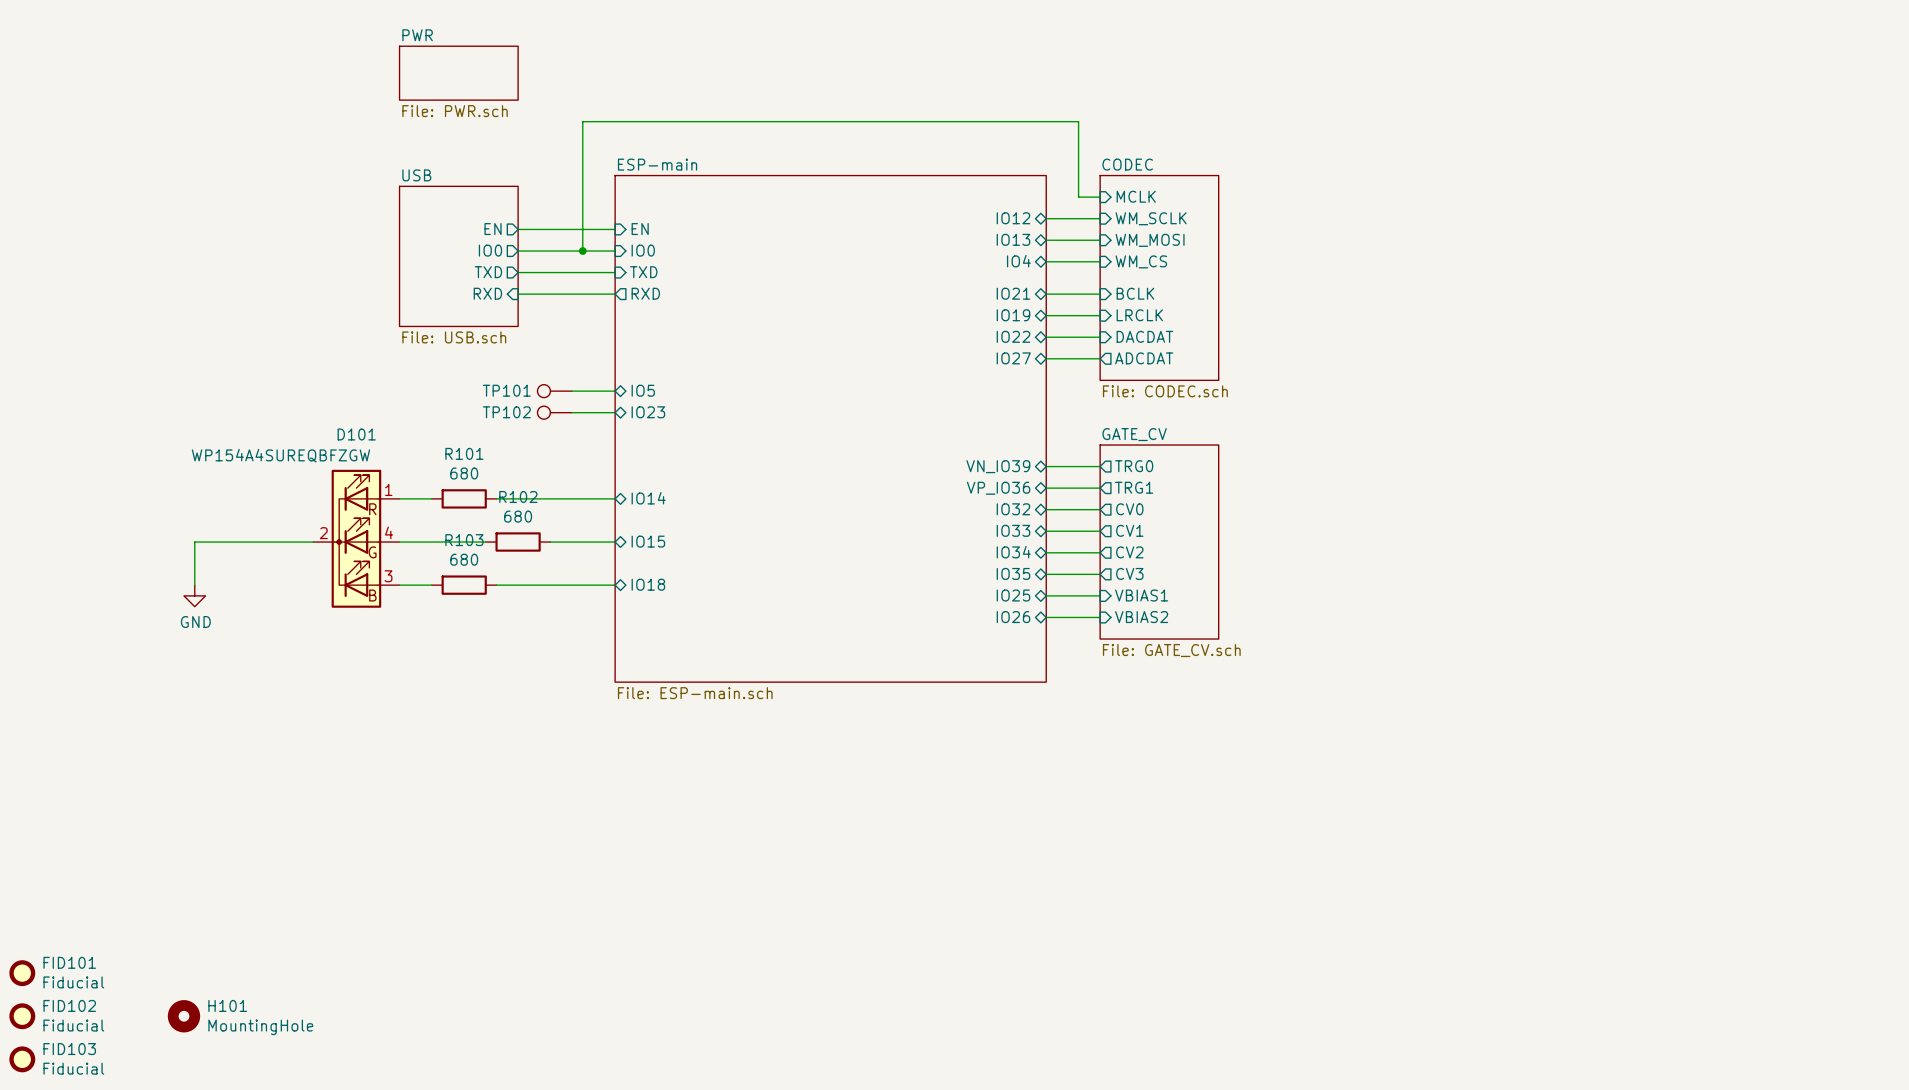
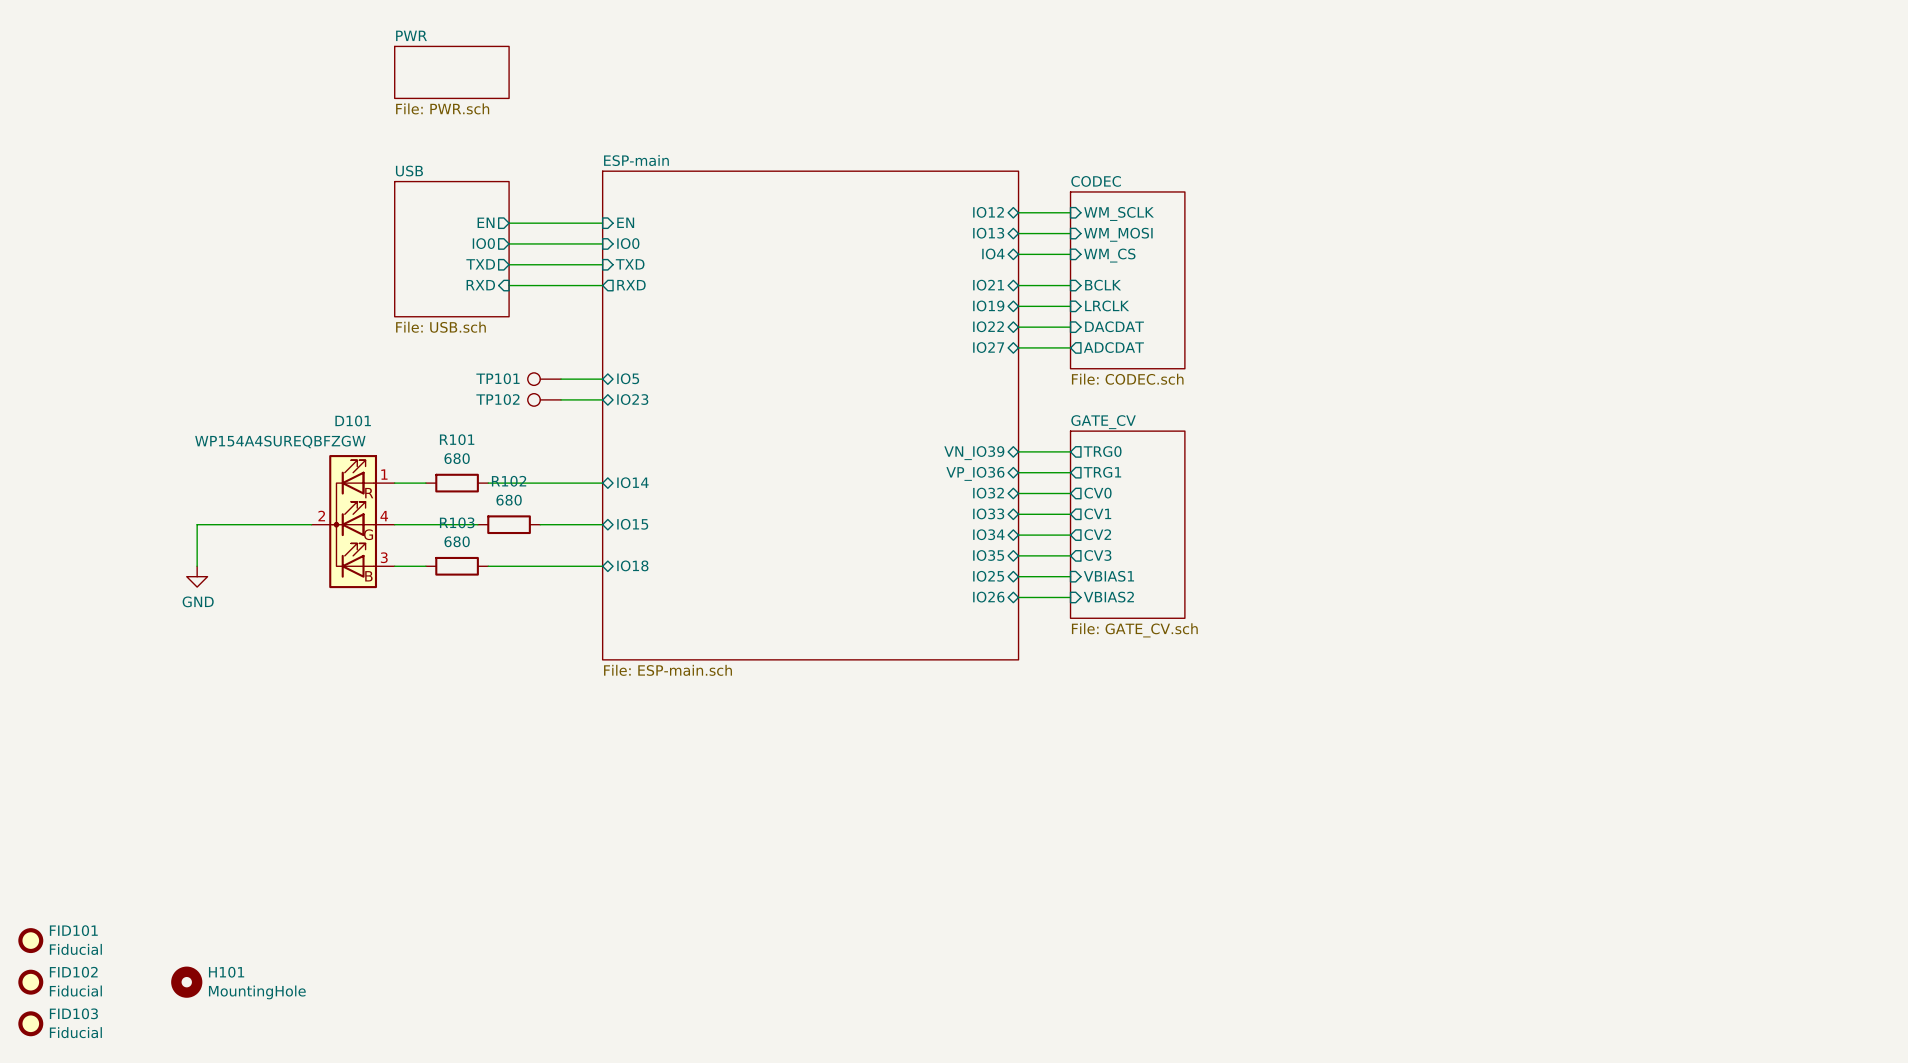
sheet pin: MCLK (1136, 196) -> none
wire: (1100, 197) (1078, 197) (1078, 121) (582, 121) (582, 251) -> none
junction: (582, 251) -> none
sheet CODEC: File: CODEC.sch (1159, 277) -> none
sheet CODEC: none -> File: CODEC.sch (1127, 280)

